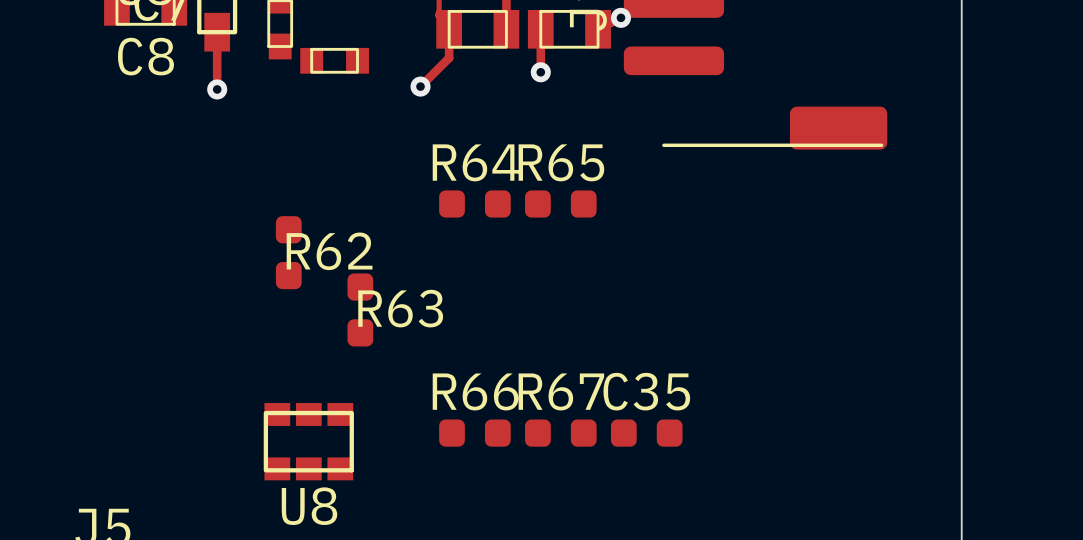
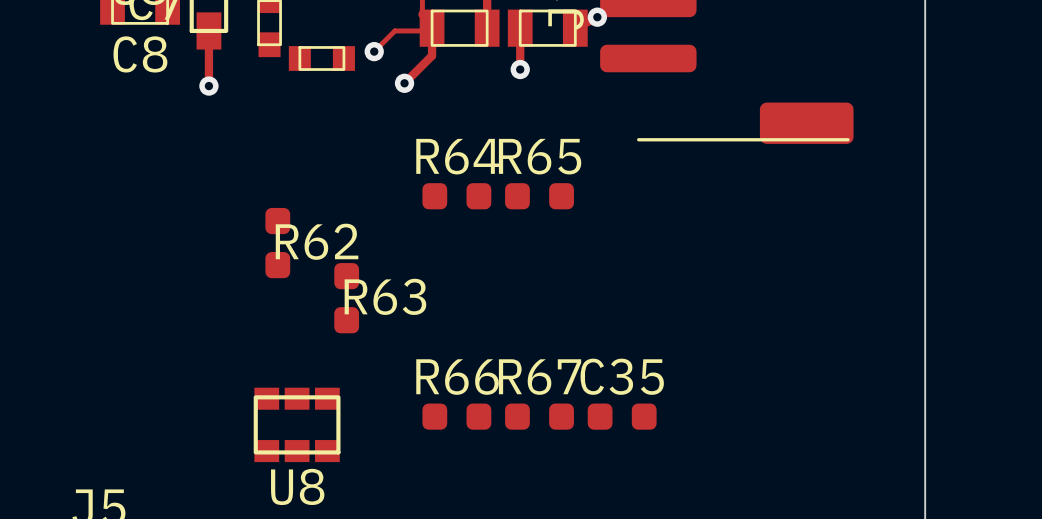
track: none -> (429, 30) (394, 30) (374, 51)
via: none -> (374, 51)

